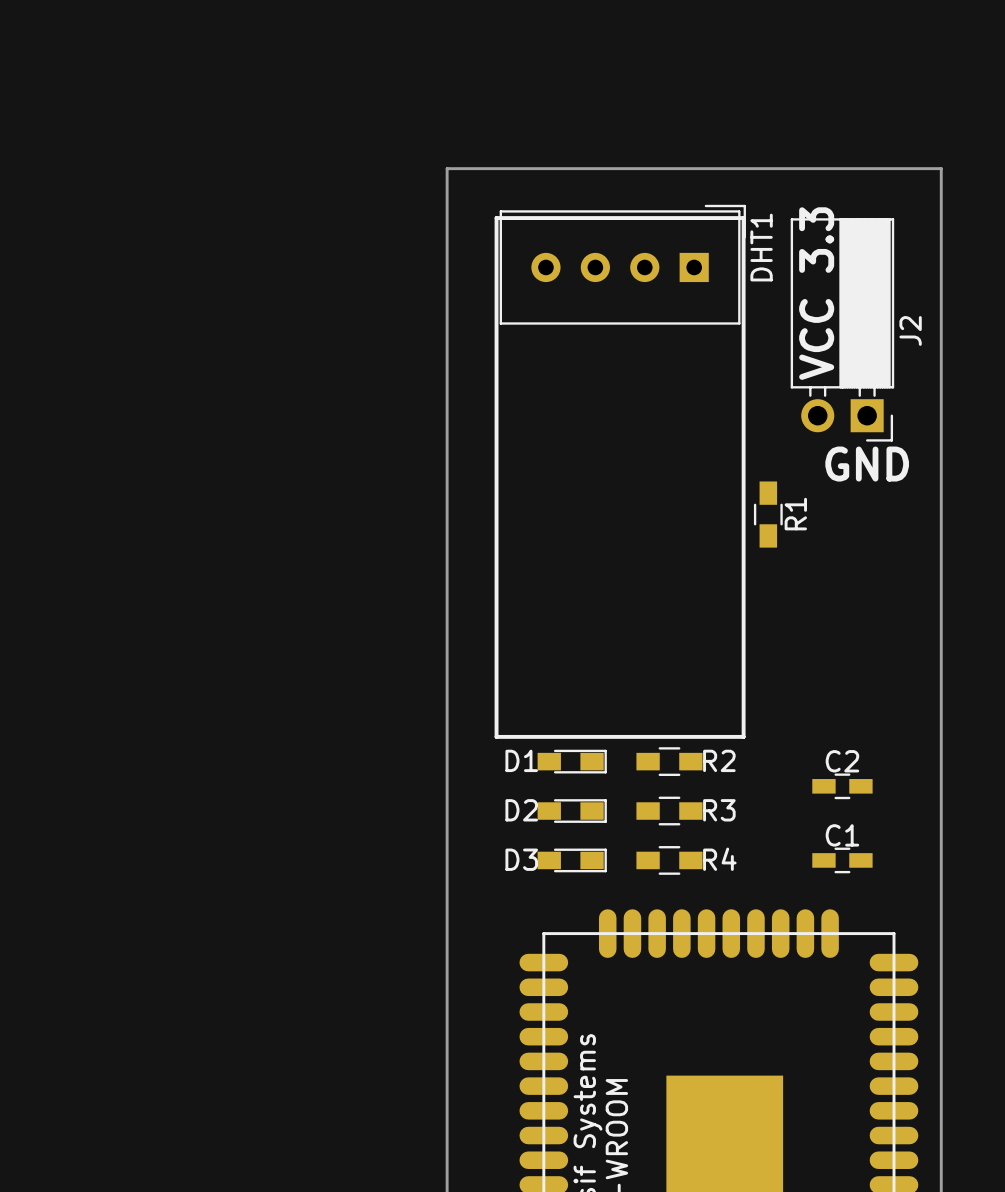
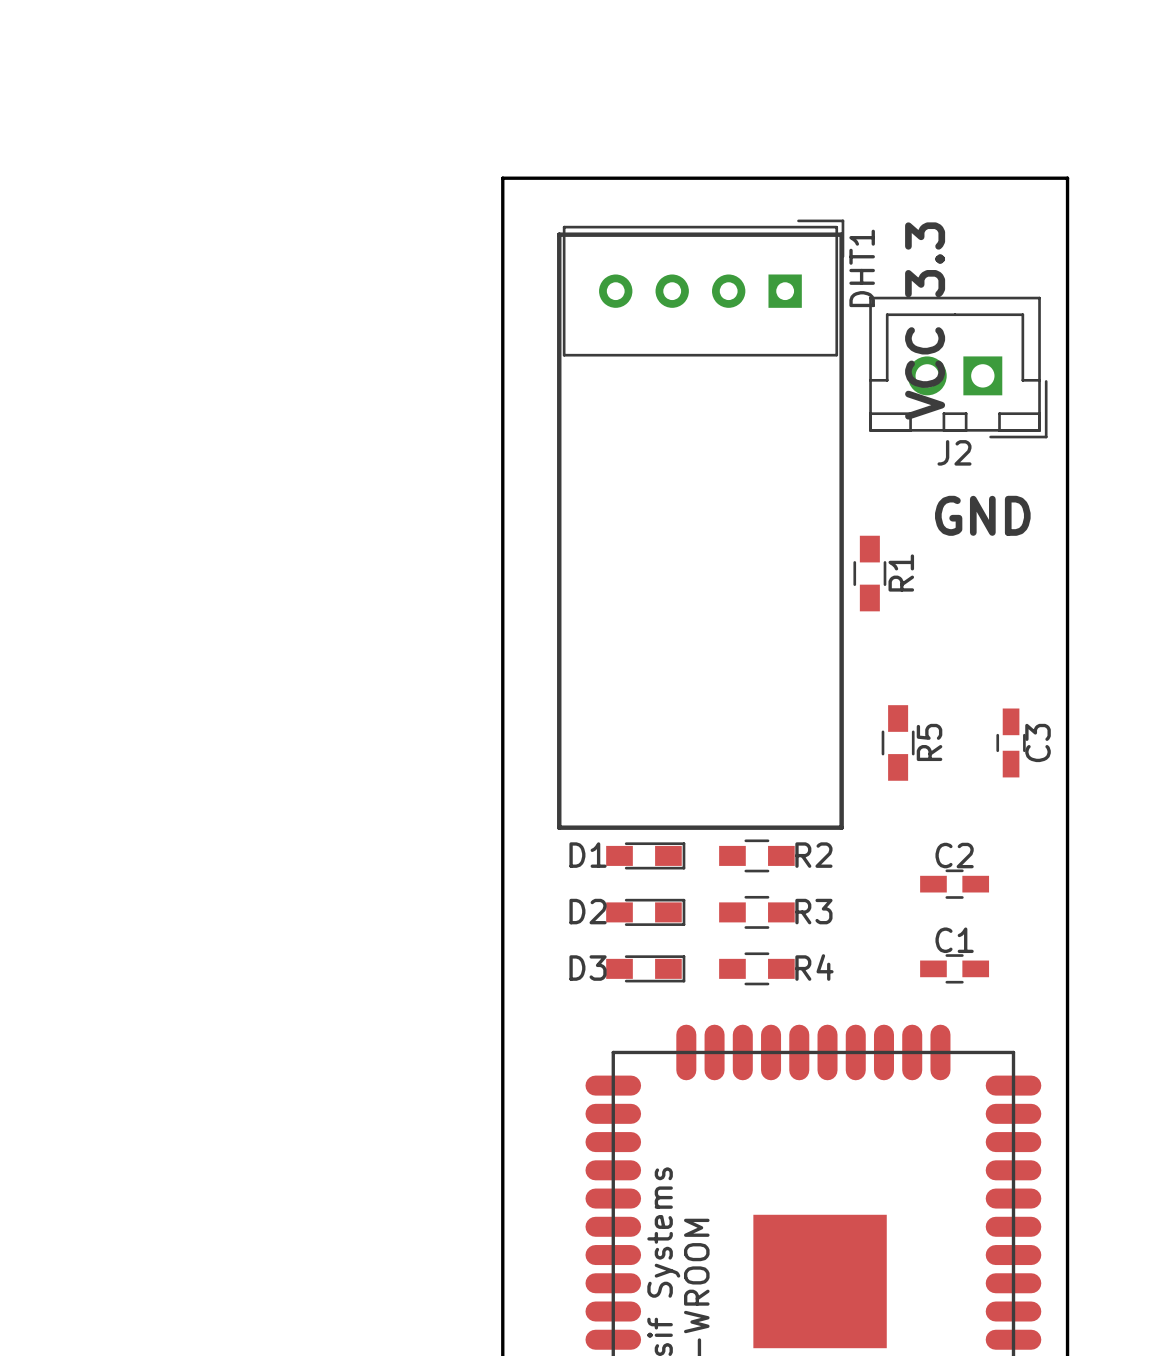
J2 footprint: [790, 218, 895, 442] -> [869, 296, 1048, 439]
J2 name position: J2 (910, 330) -> J2 (954, 452)
R5: none -> (898, 742)
C3: none -> (1011, 742)

